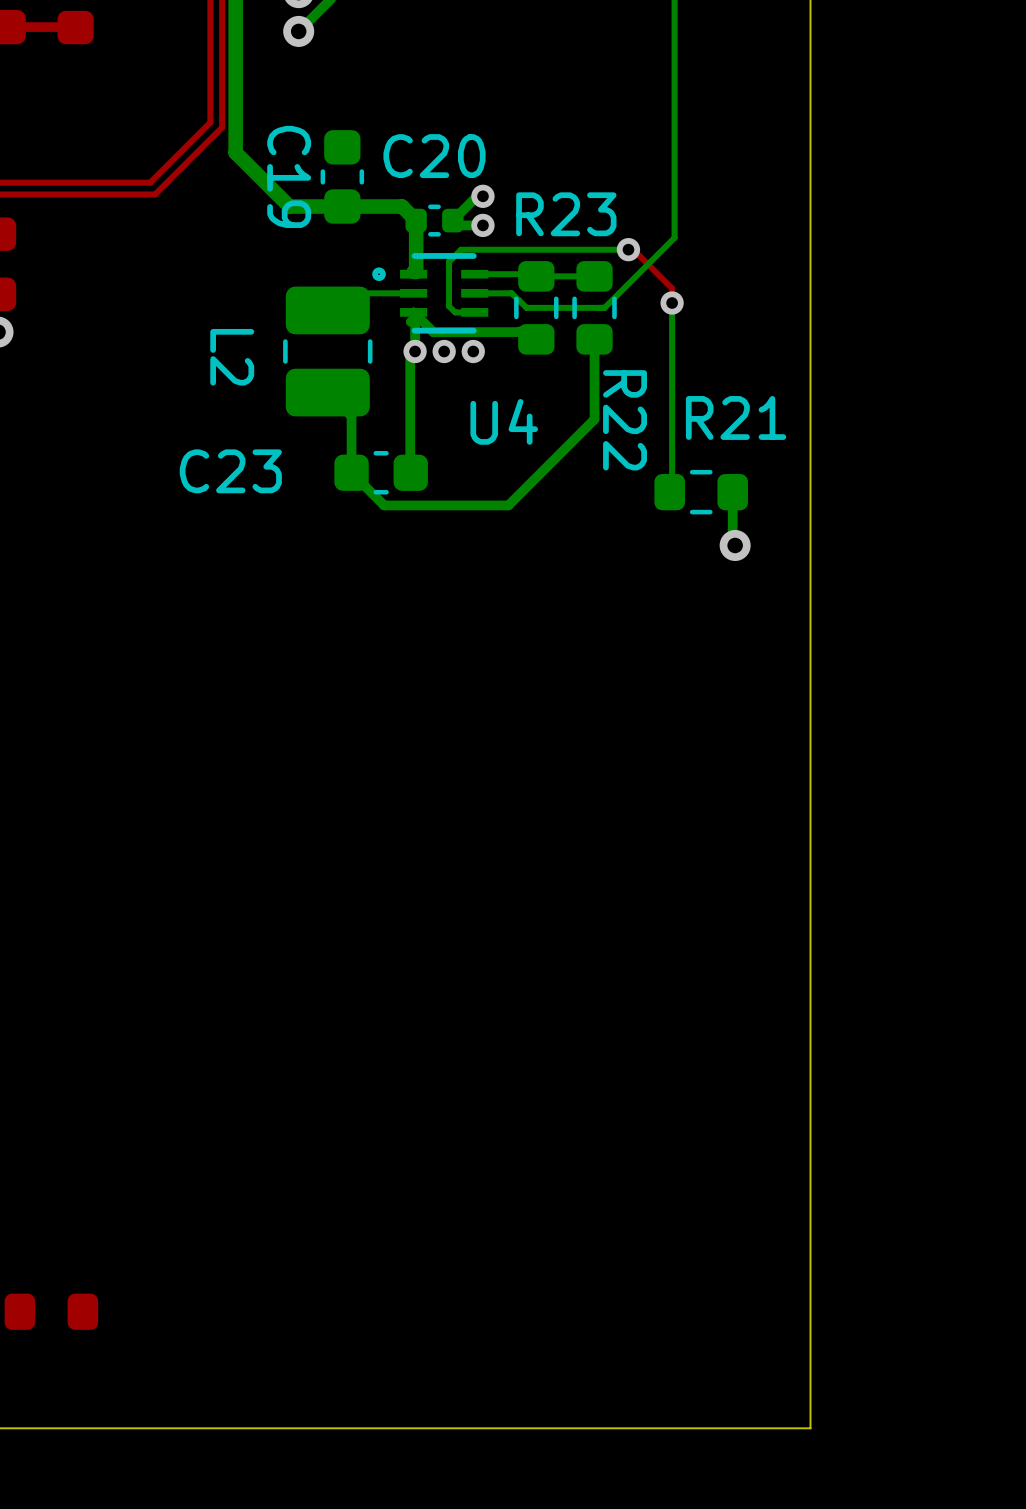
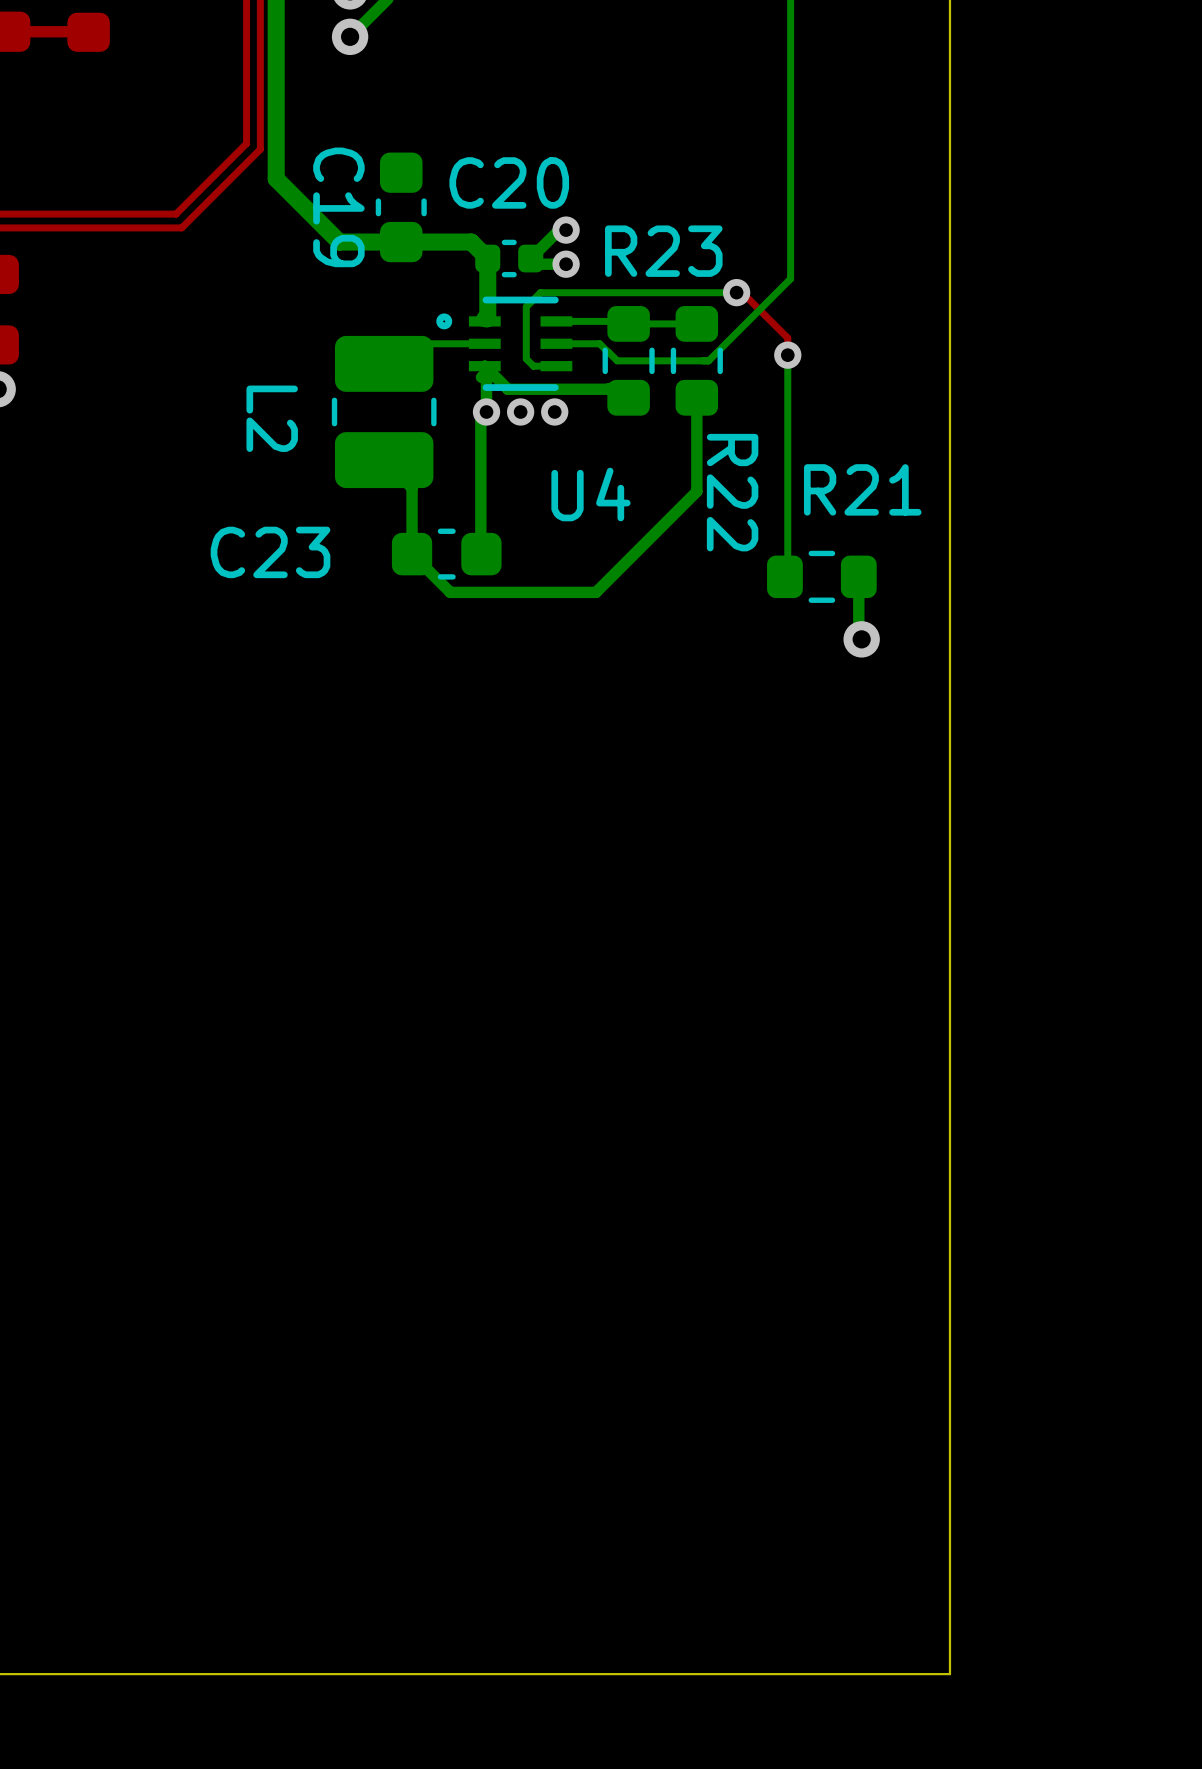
part: (51, 1311) -> none

